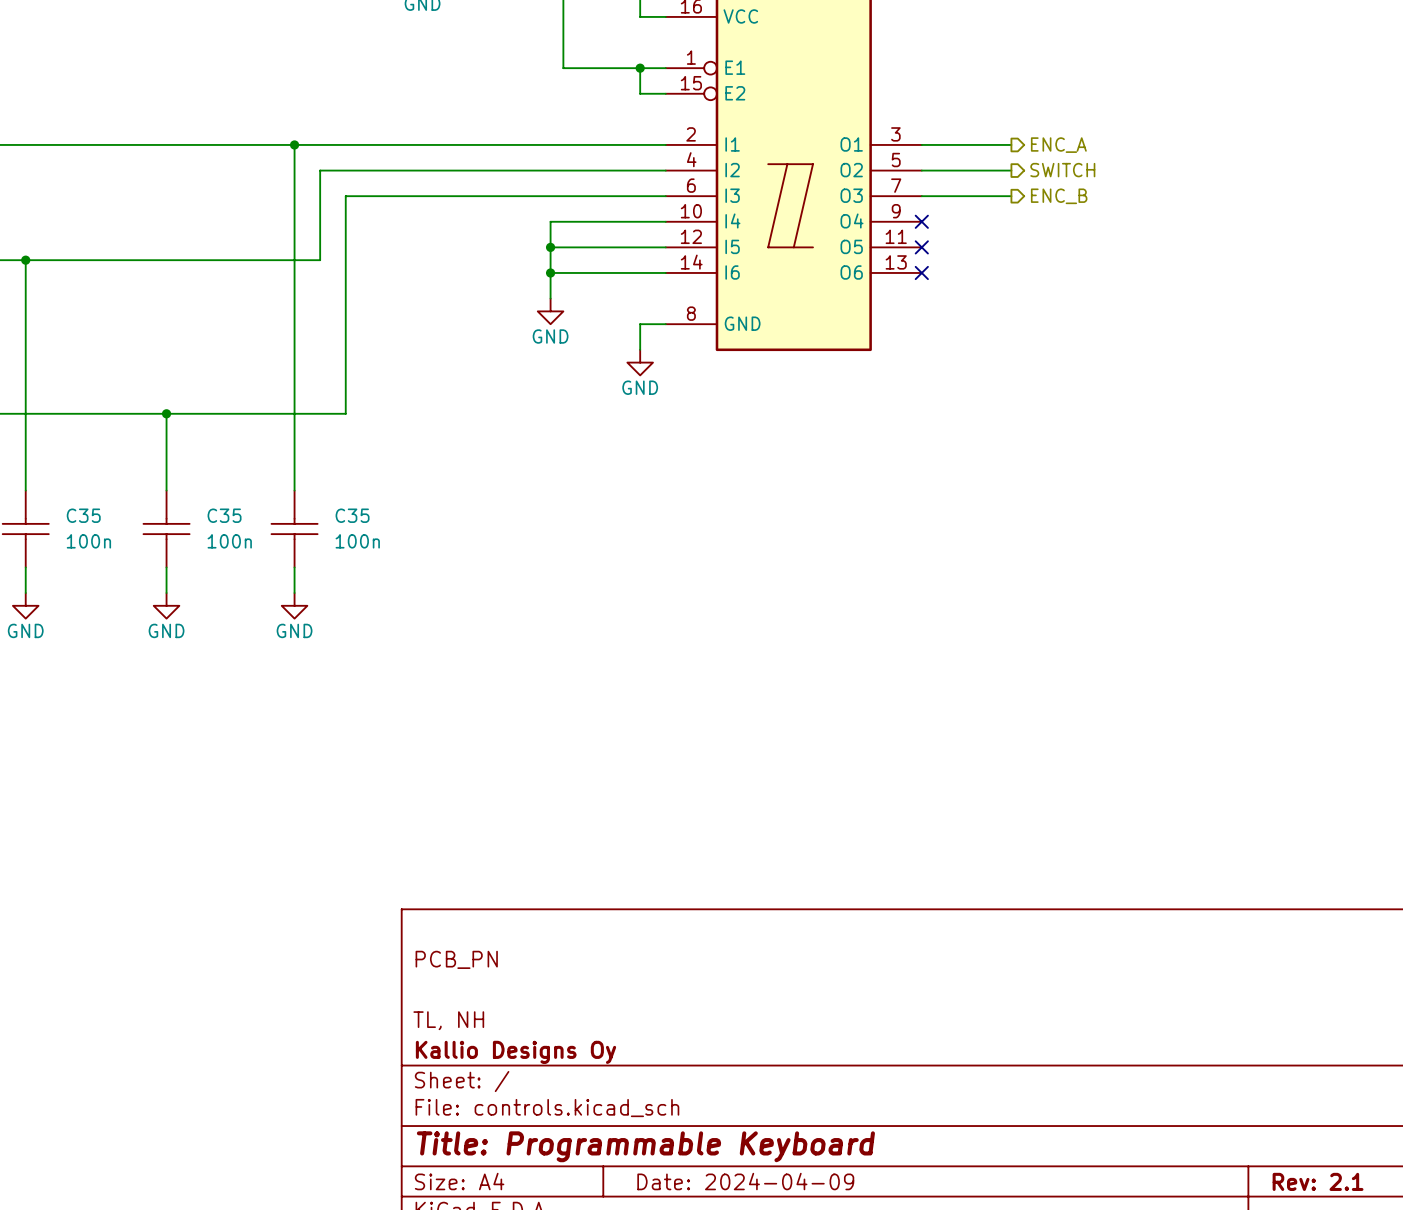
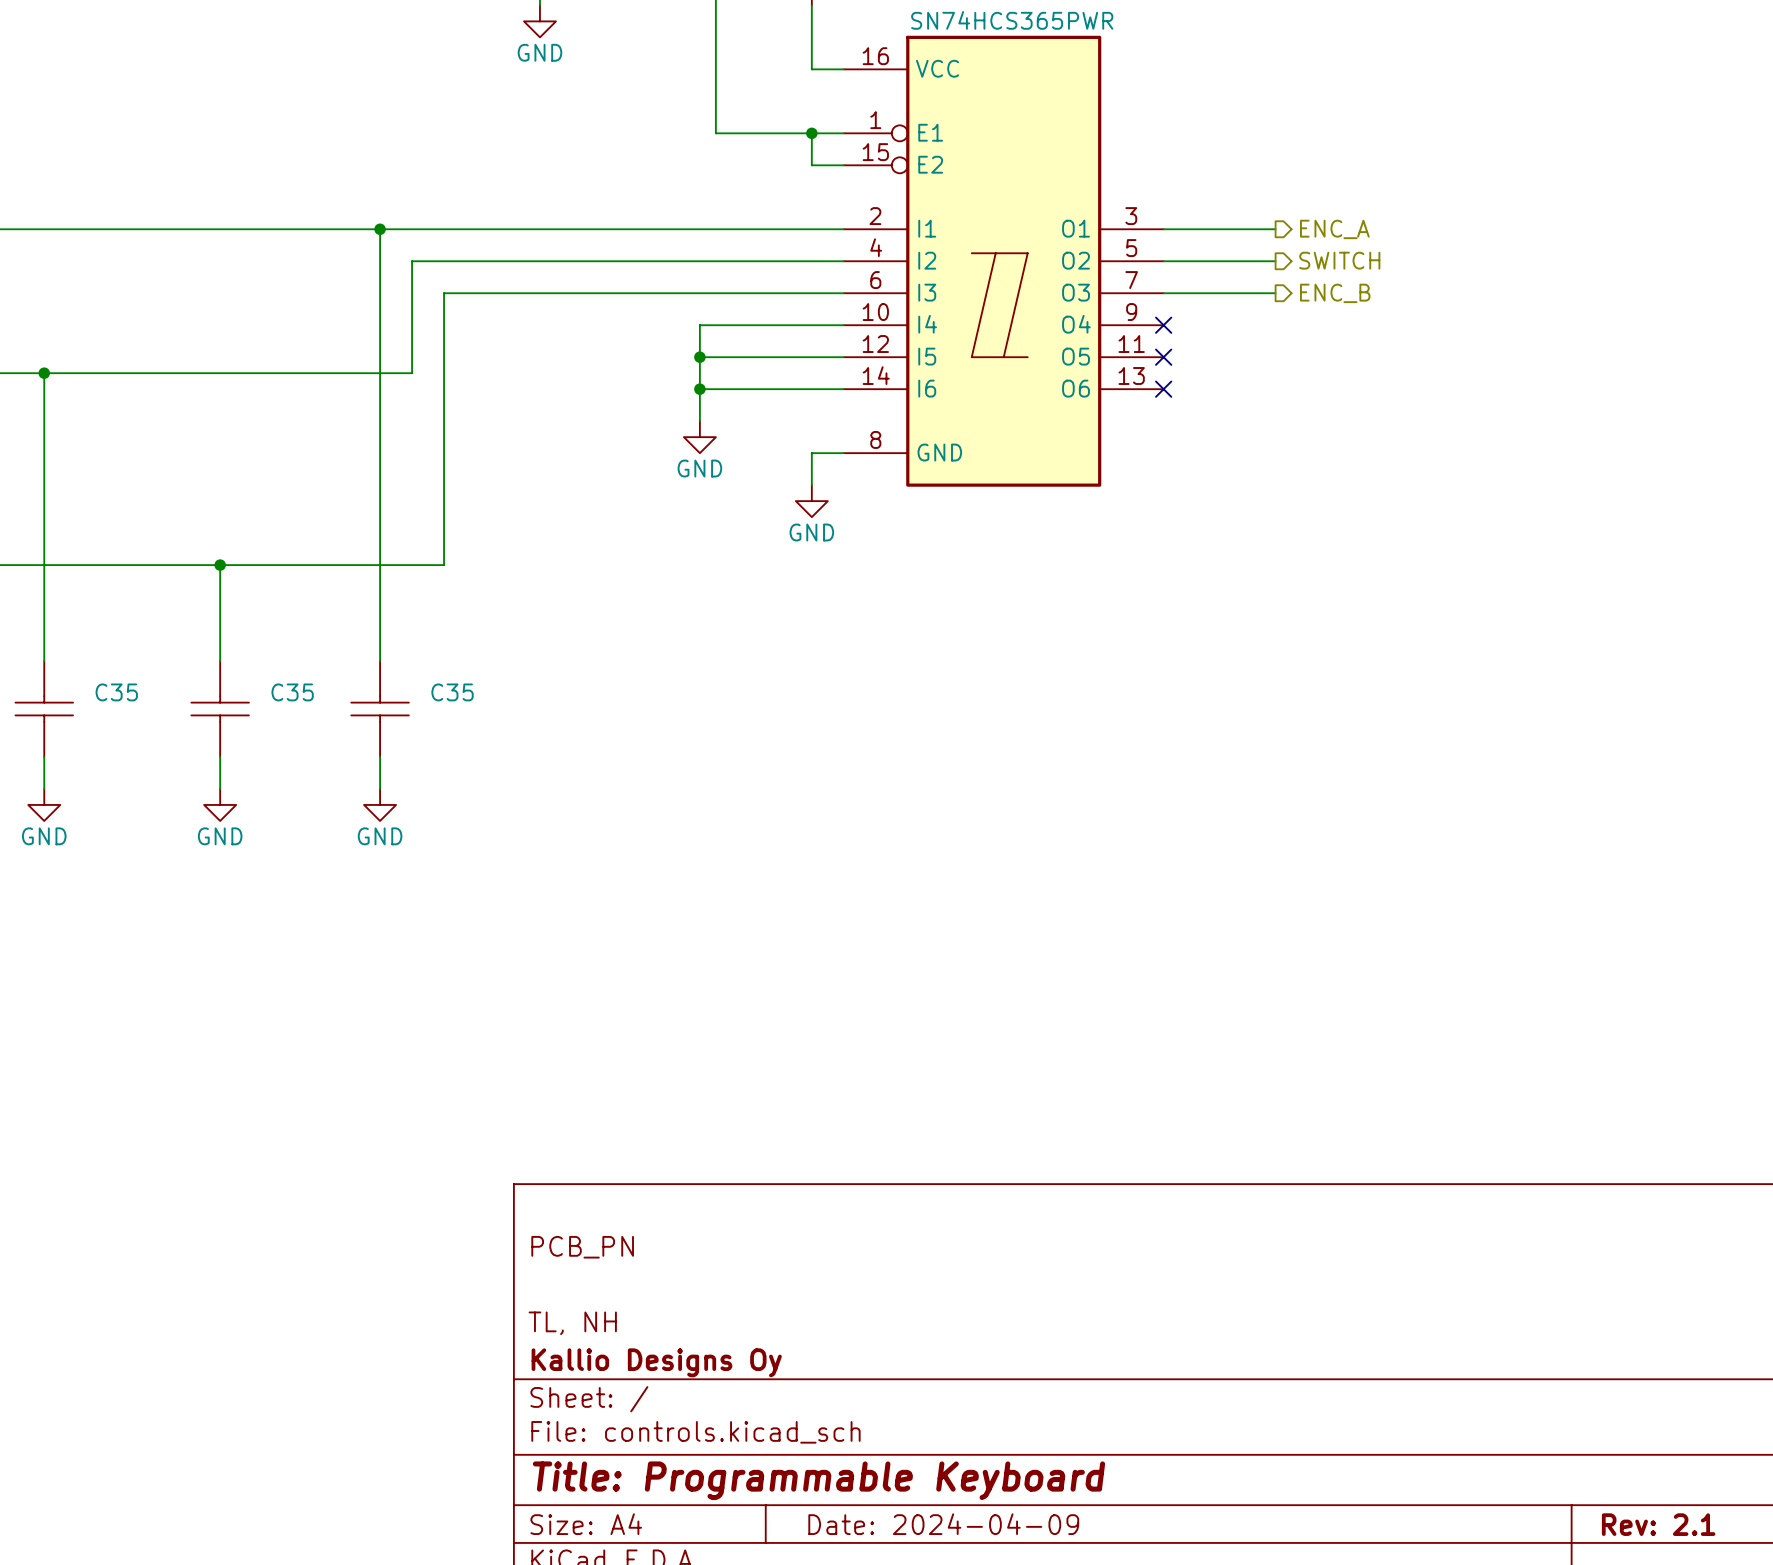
C35 value: 100n (88, 541) -> none
C35 value: 100n (229, 541) -> none
C35 value: 100n (357, 541) -> none

